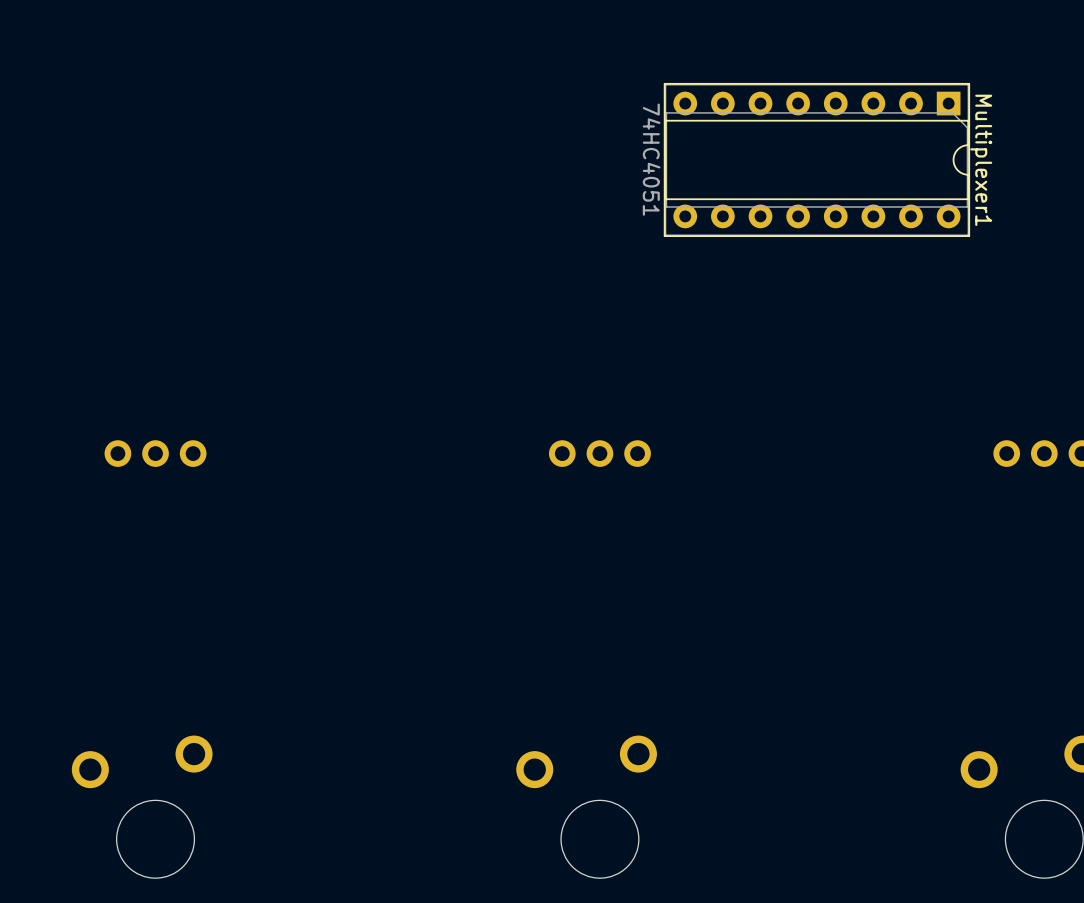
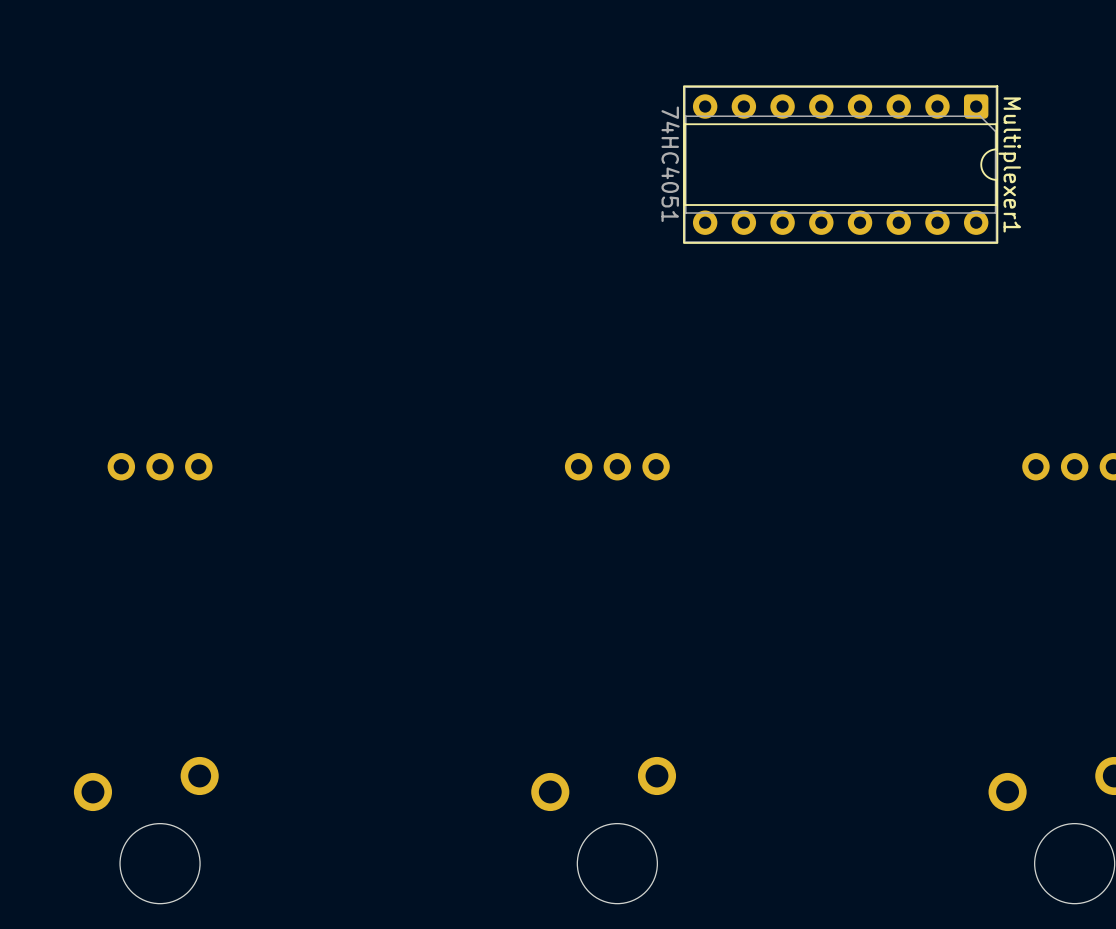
Multiplexer1 footprint: [663, 82, 971, 238] -> [683, 85, 999, 244]

